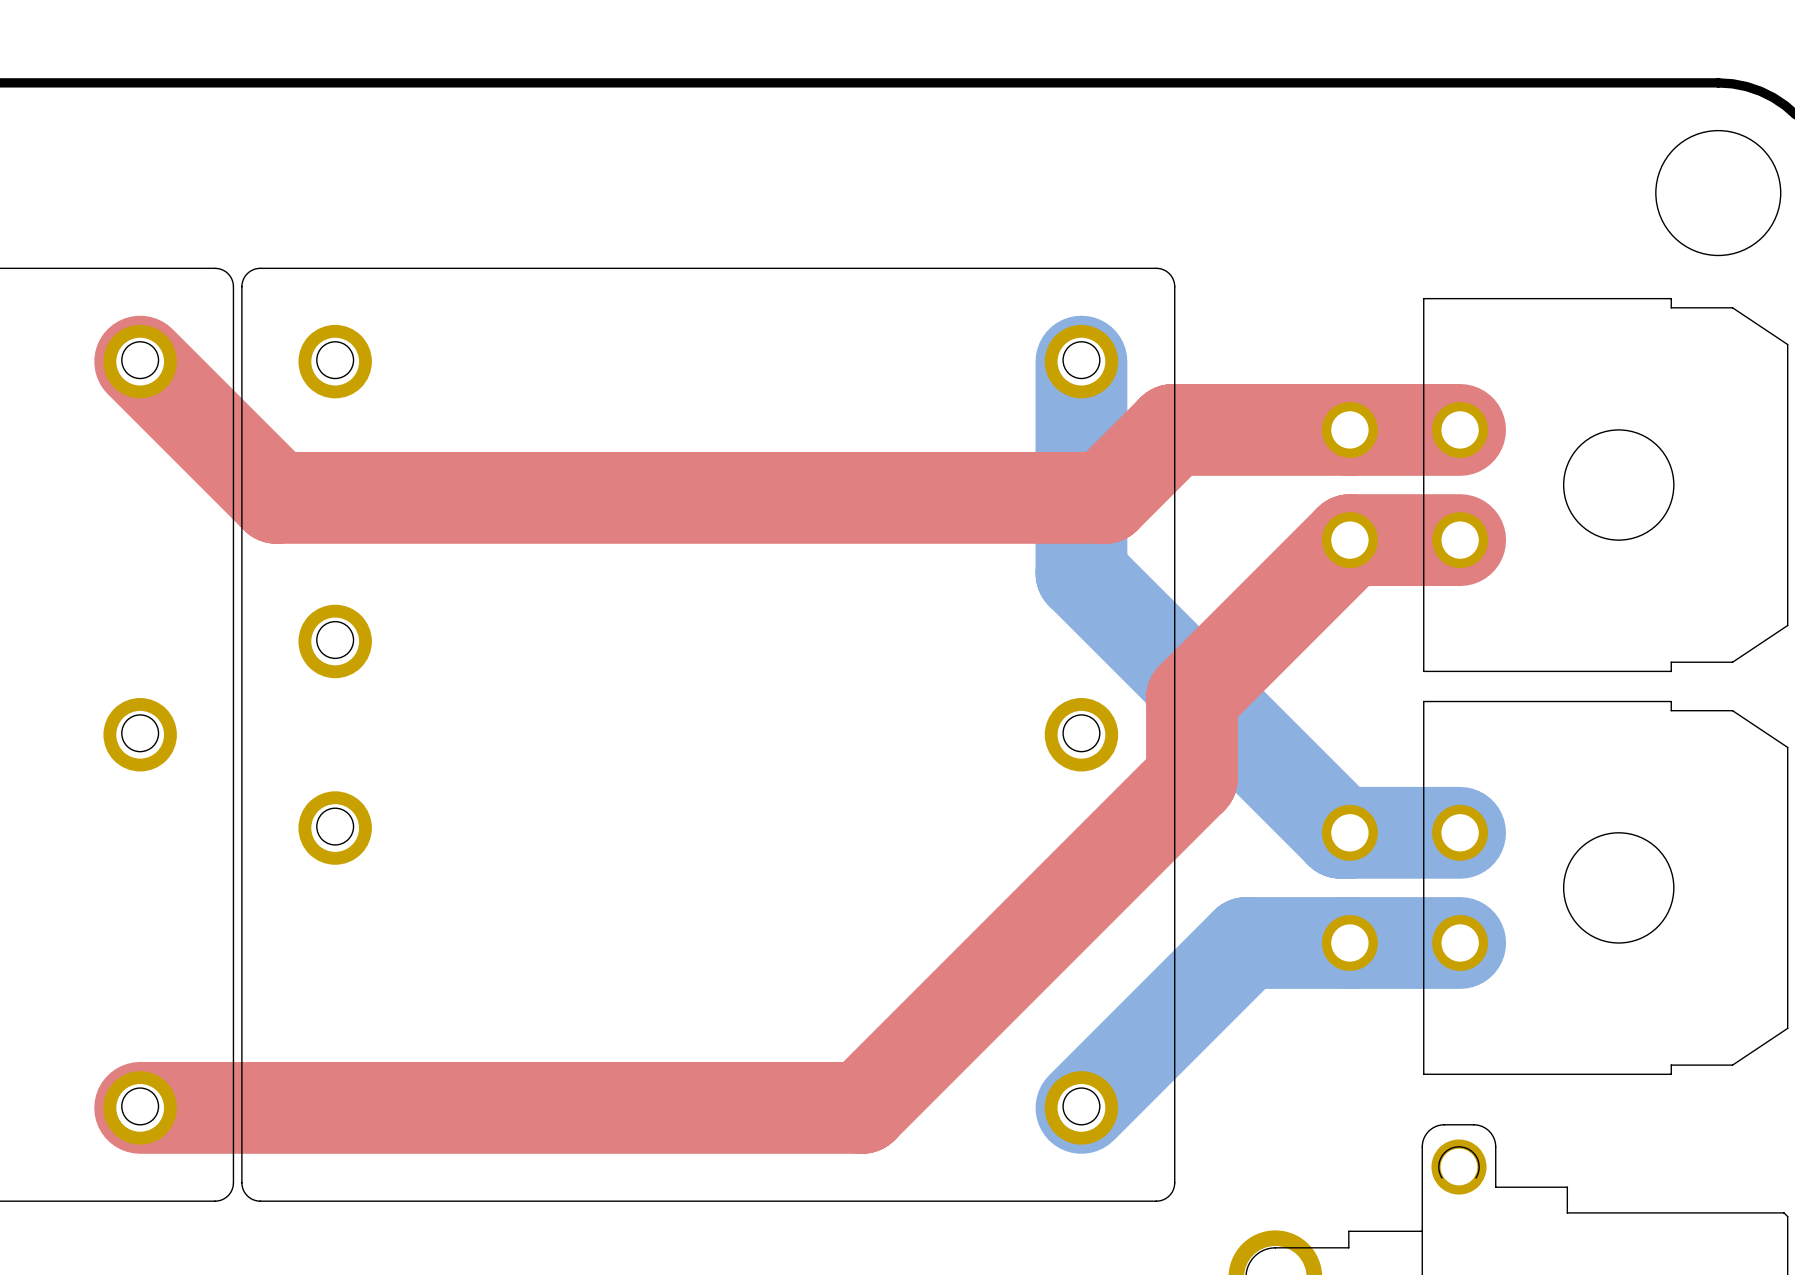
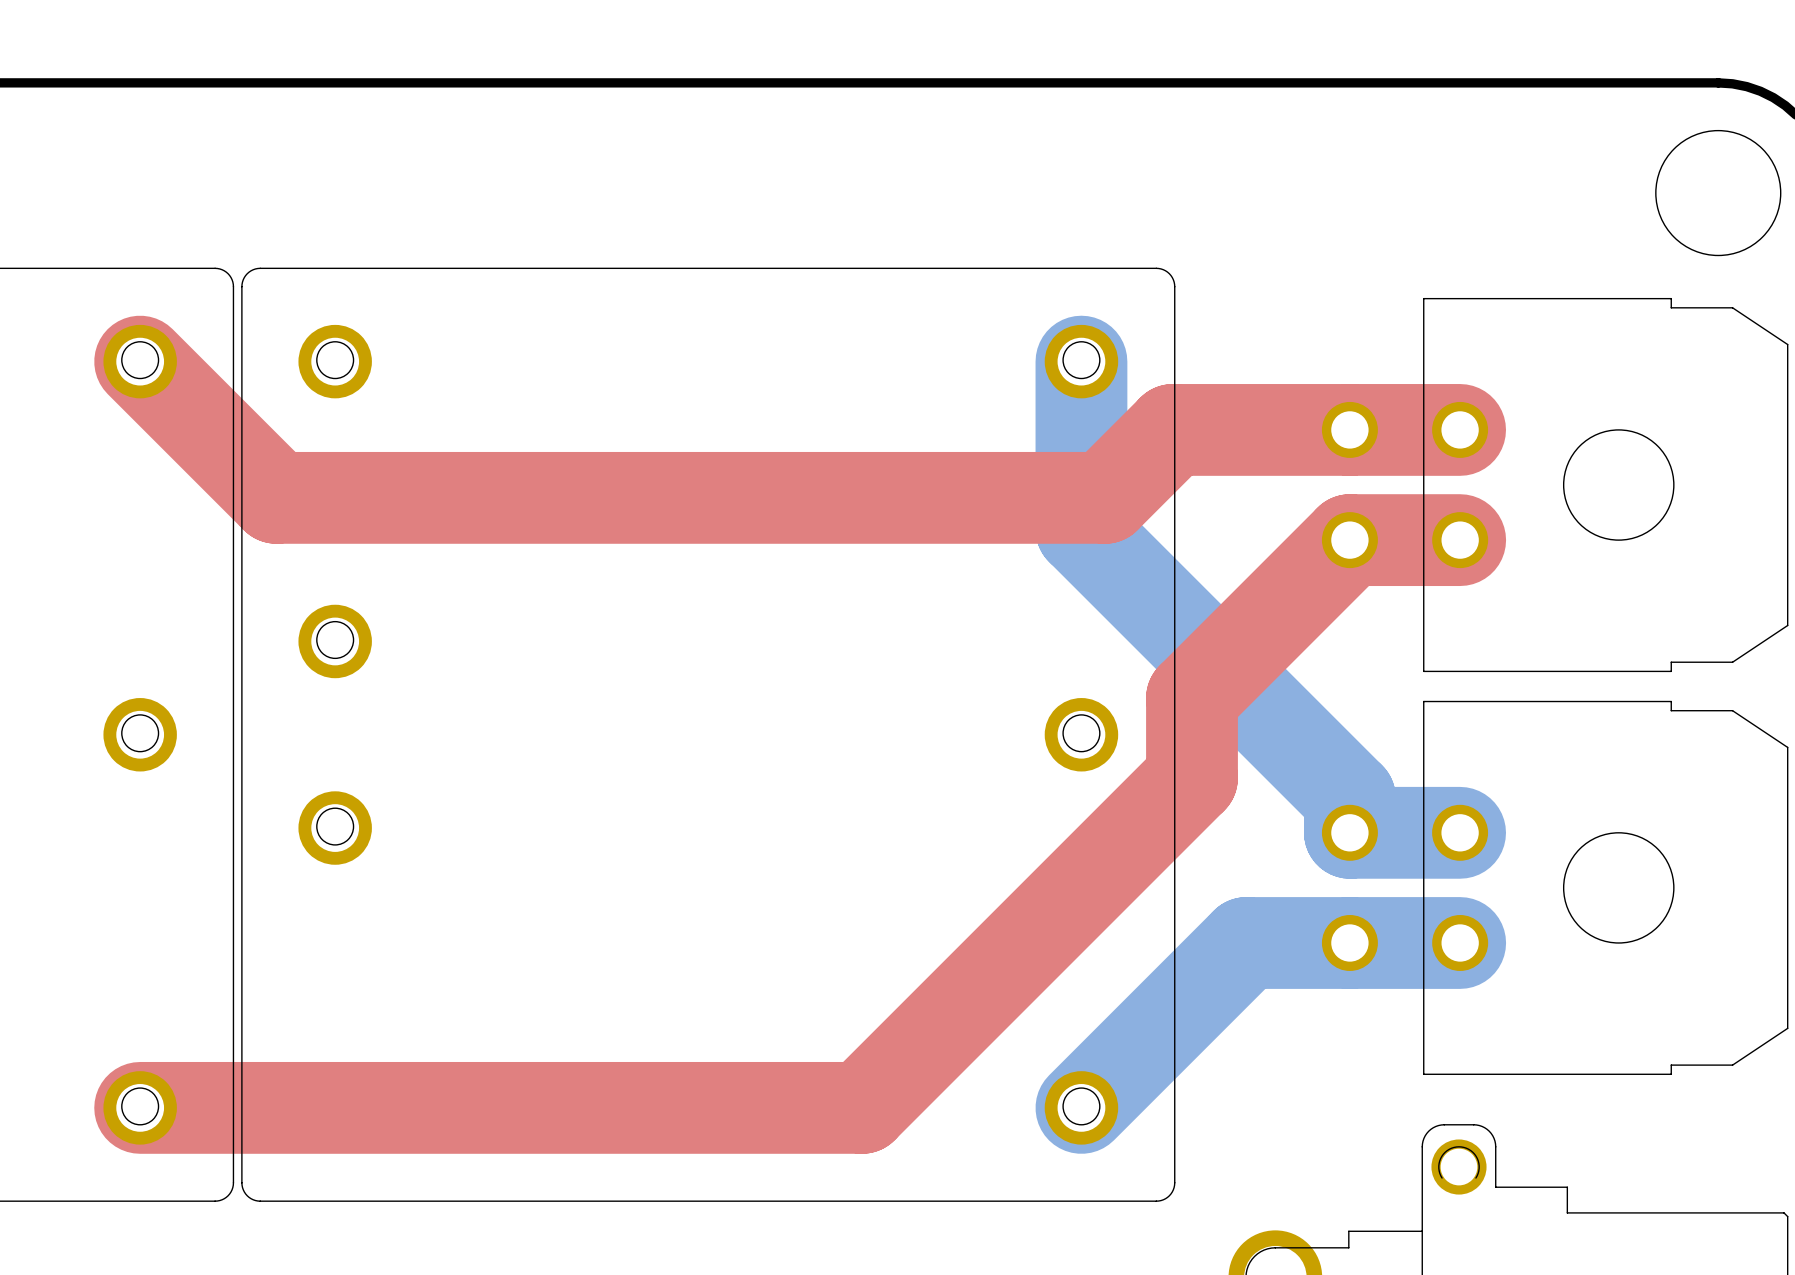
bottom track: (1081, 529) (1081, 573) (1340, 832) (1349, 832) -> (1081, 529) (1349, 797) (1349, 832)

